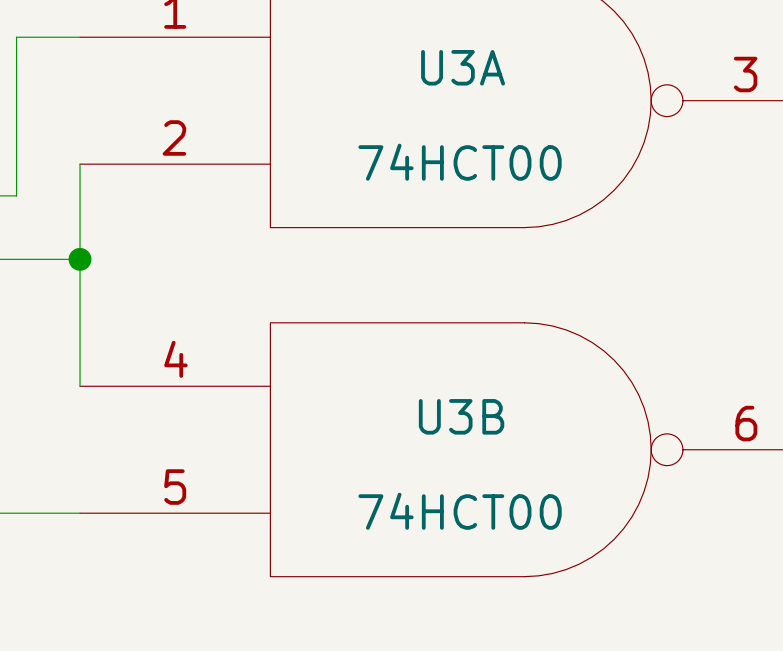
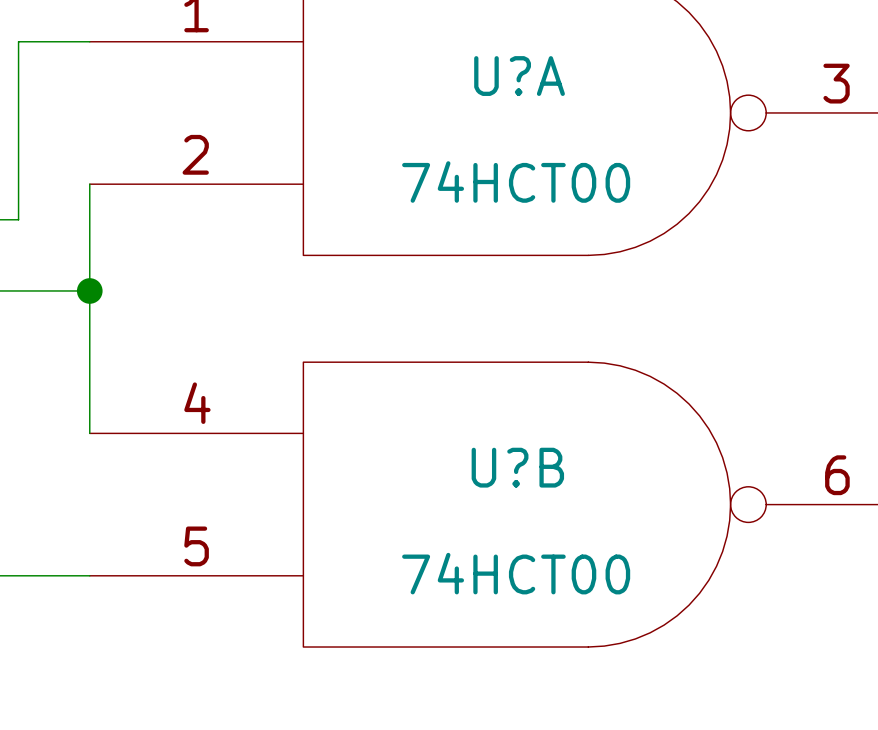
U3A name: U3A (463, 67) -> U?A (519, 76)
U3B name: U3B (461, 416) -> U?B (517, 467)

